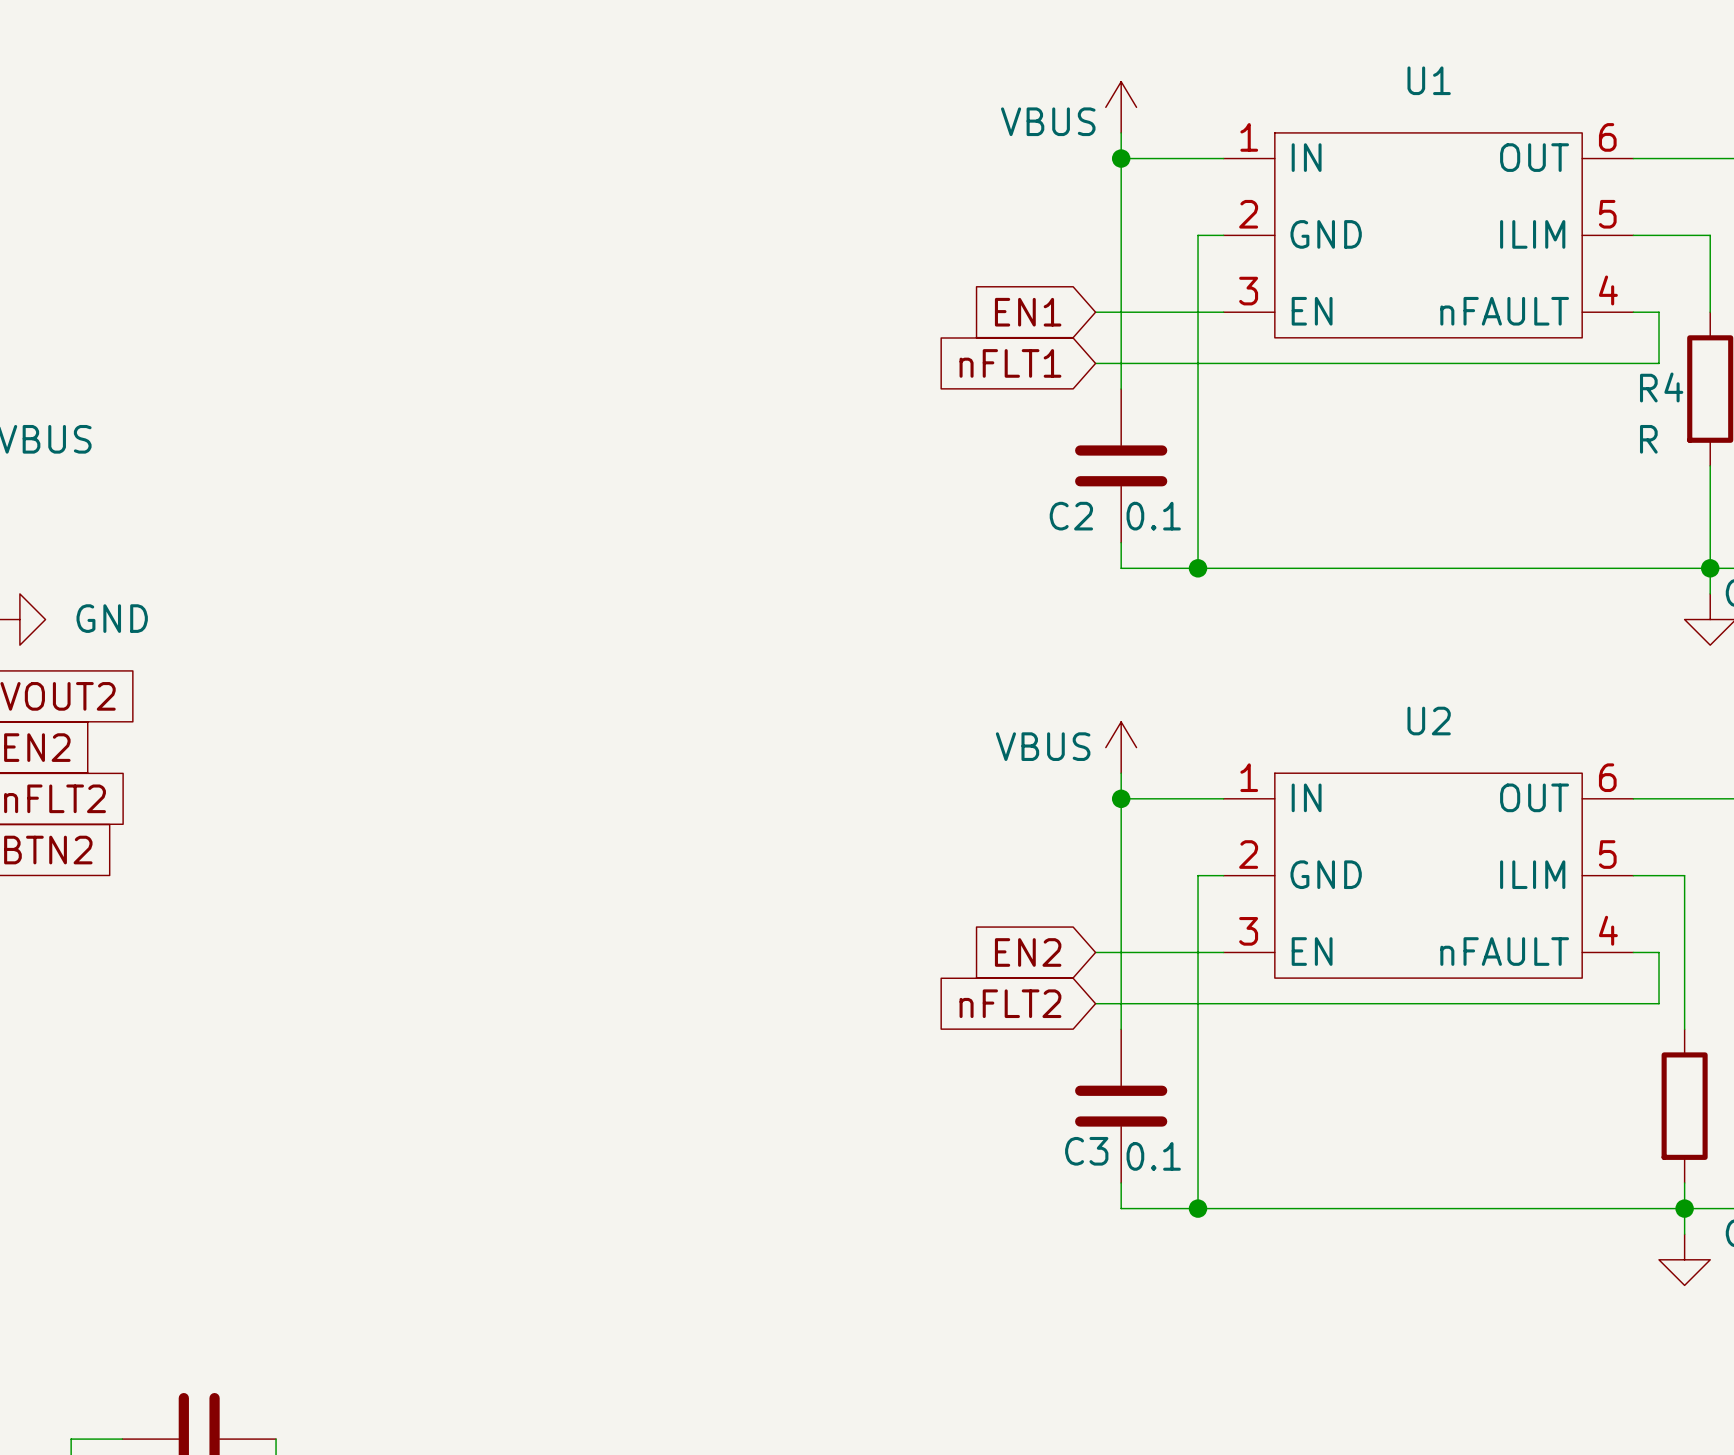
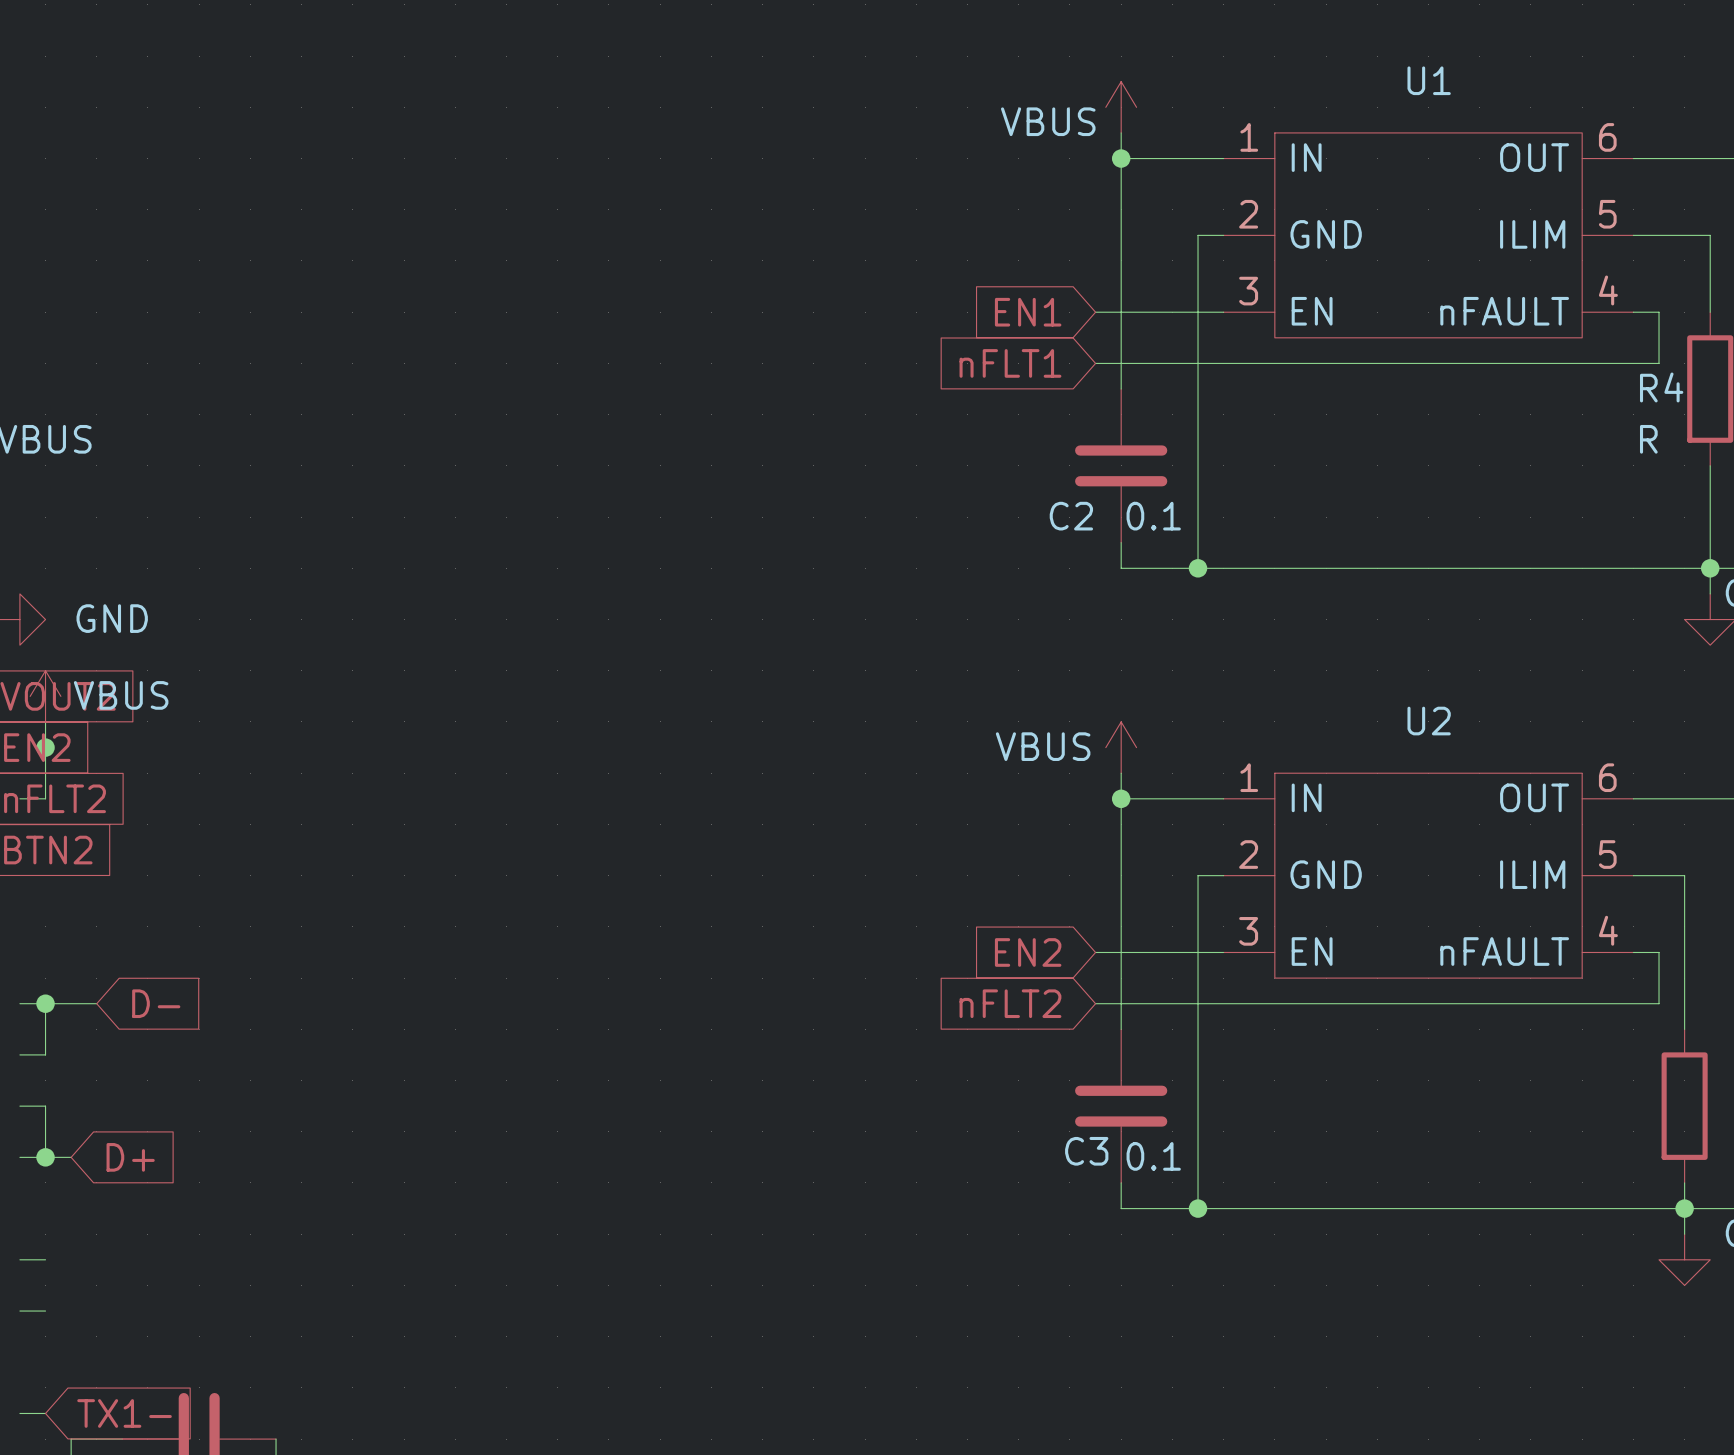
power symbol: none -> VBUS (45, 696)
wire: none -> (45, 721) (45, 798) (19, 798)
junction: none -> (45, 747)
wire: none -> (19, 1003) (96, 1003)
wire: none -> (45, 1003) (45, 1054) (19, 1054)
junction: none -> (45, 1003)
global label: none -> D- (156, 1003)
wire: none -> (19, 1106) (45, 1106) (45, 1157)
wire: none -> (19, 1157) (71, 1157)
junction: none -> (45, 1157)
global label: none -> D+ (130, 1157)
wire: none -> (19, 1259) (45, 1259)
wire: none -> (19, 1311) (45, 1311)
wire: none -> (19, 1413) (45, 1413)
global label: none -> TX1- (124, 1413)

